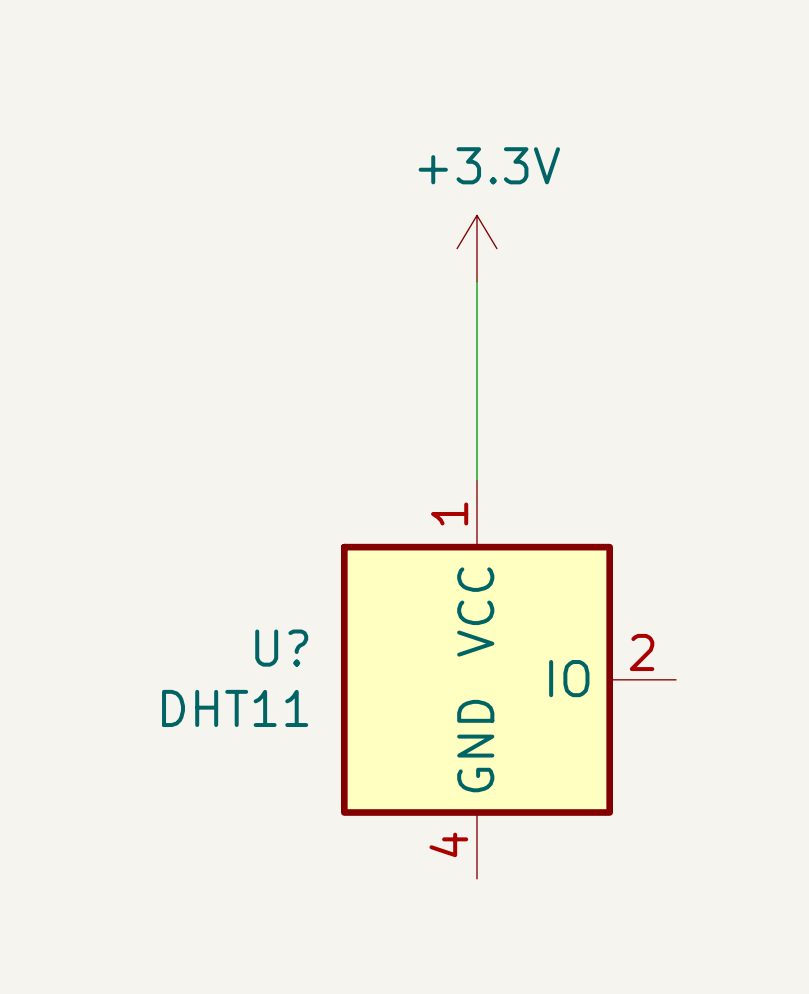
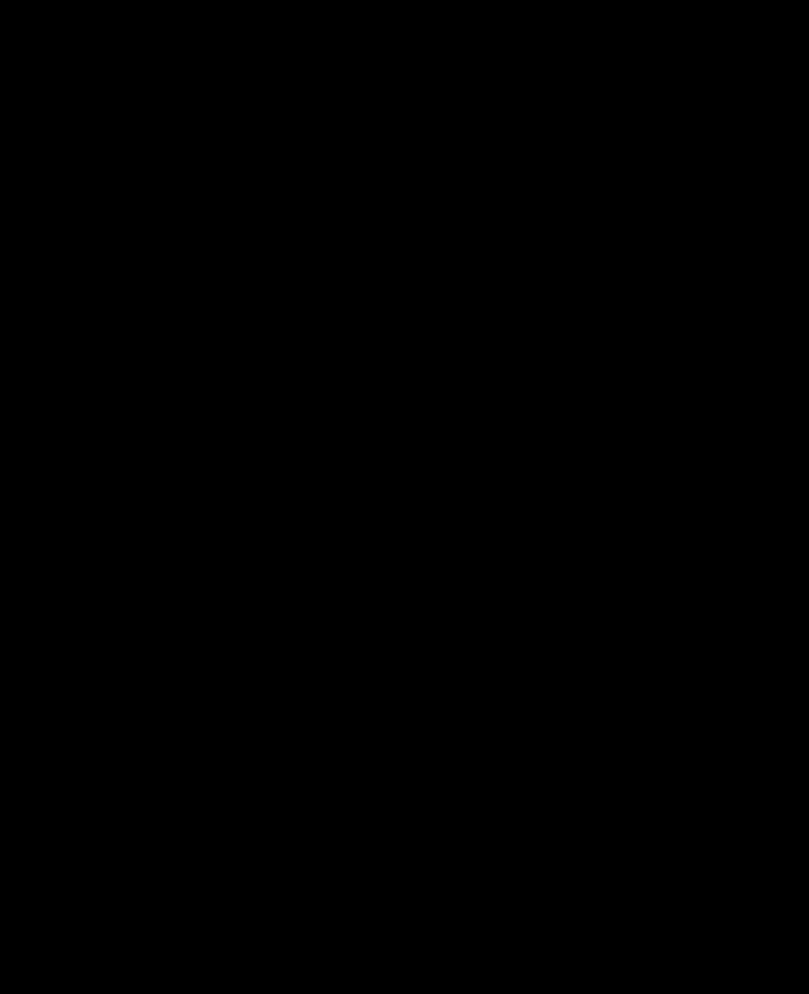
power symbol: +3.3V (476, 248) -> none
wire: (476, 281) (476, 480) -> none
U?: DHT11 (508, 679) -> none

